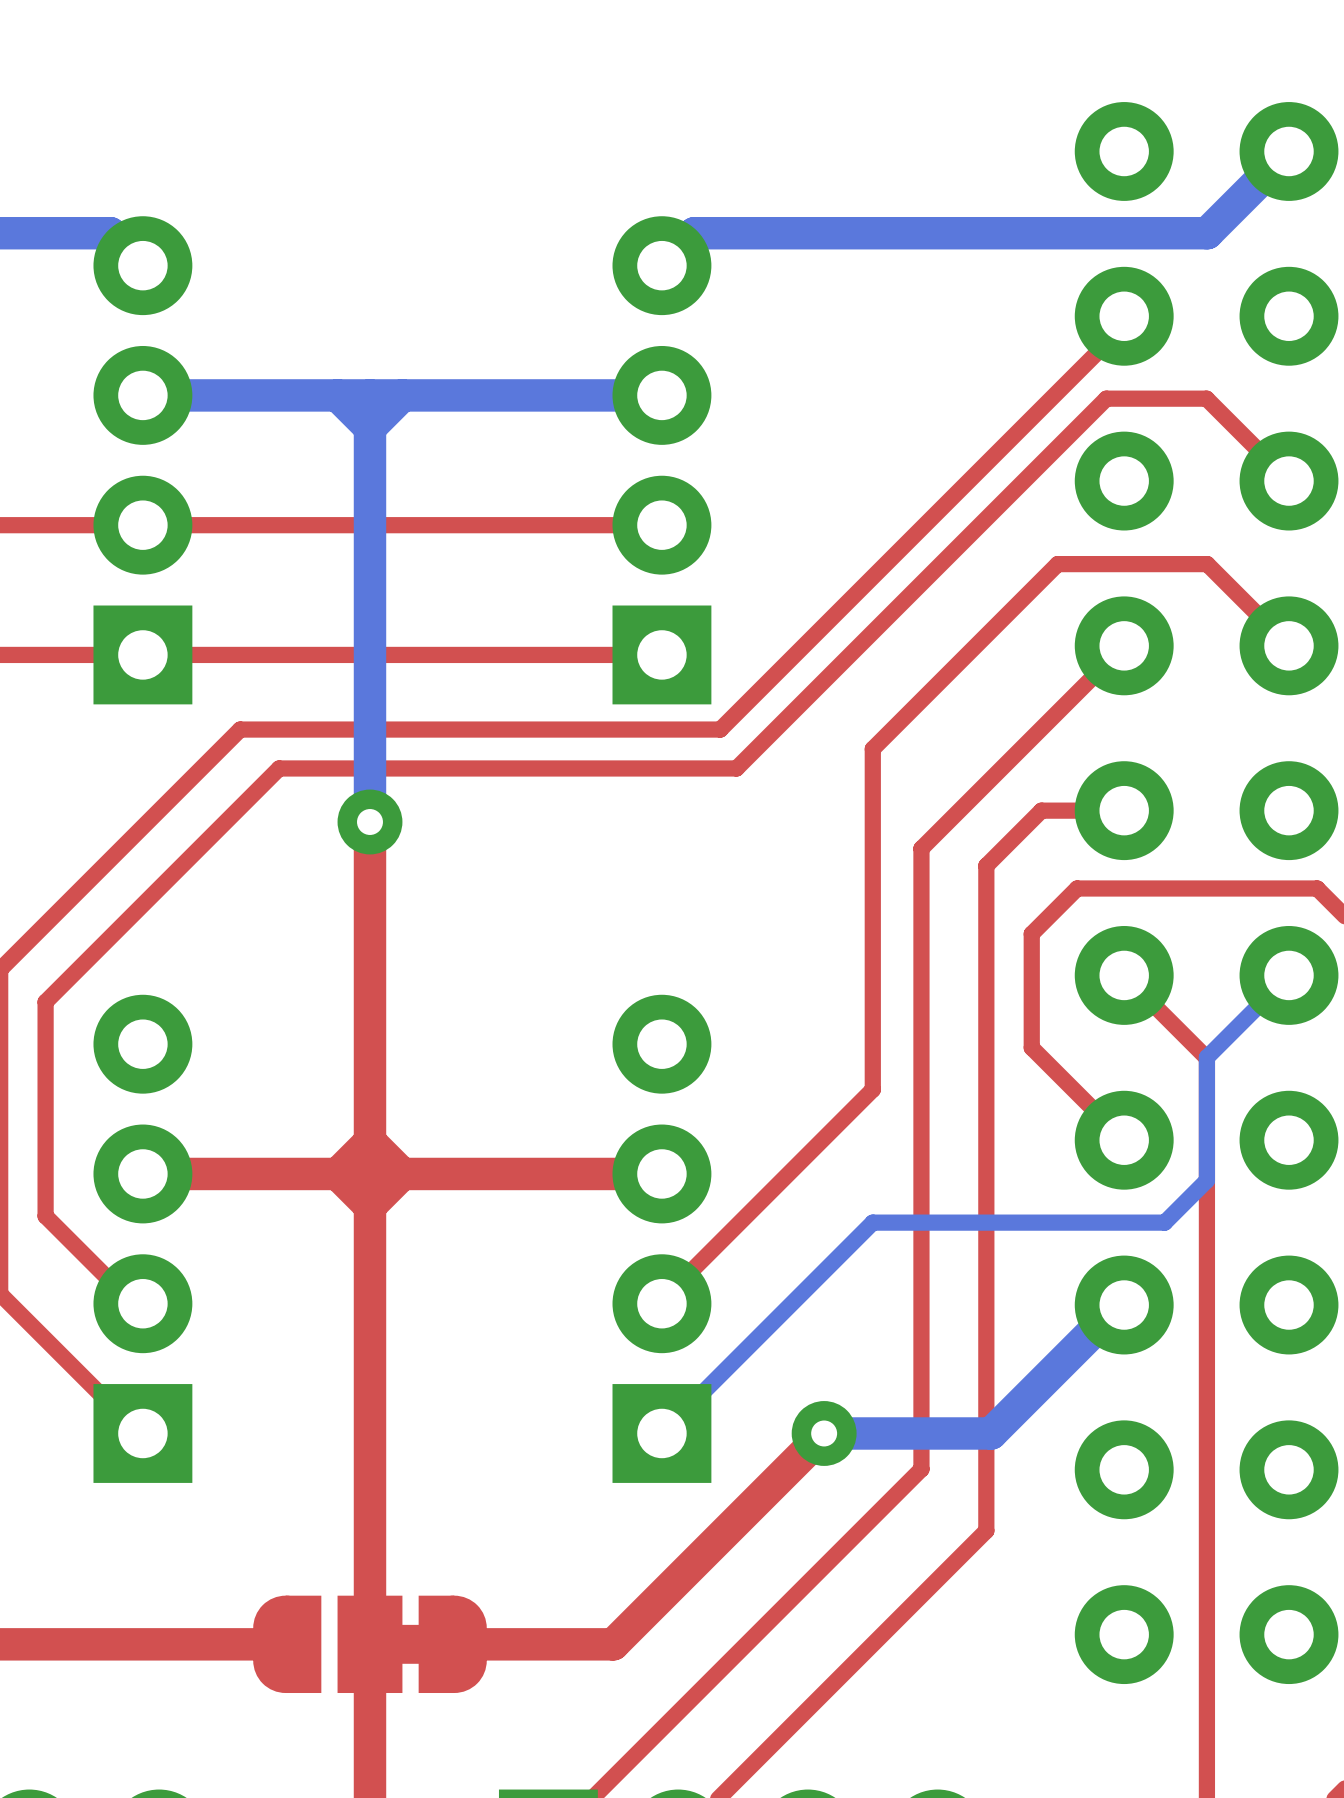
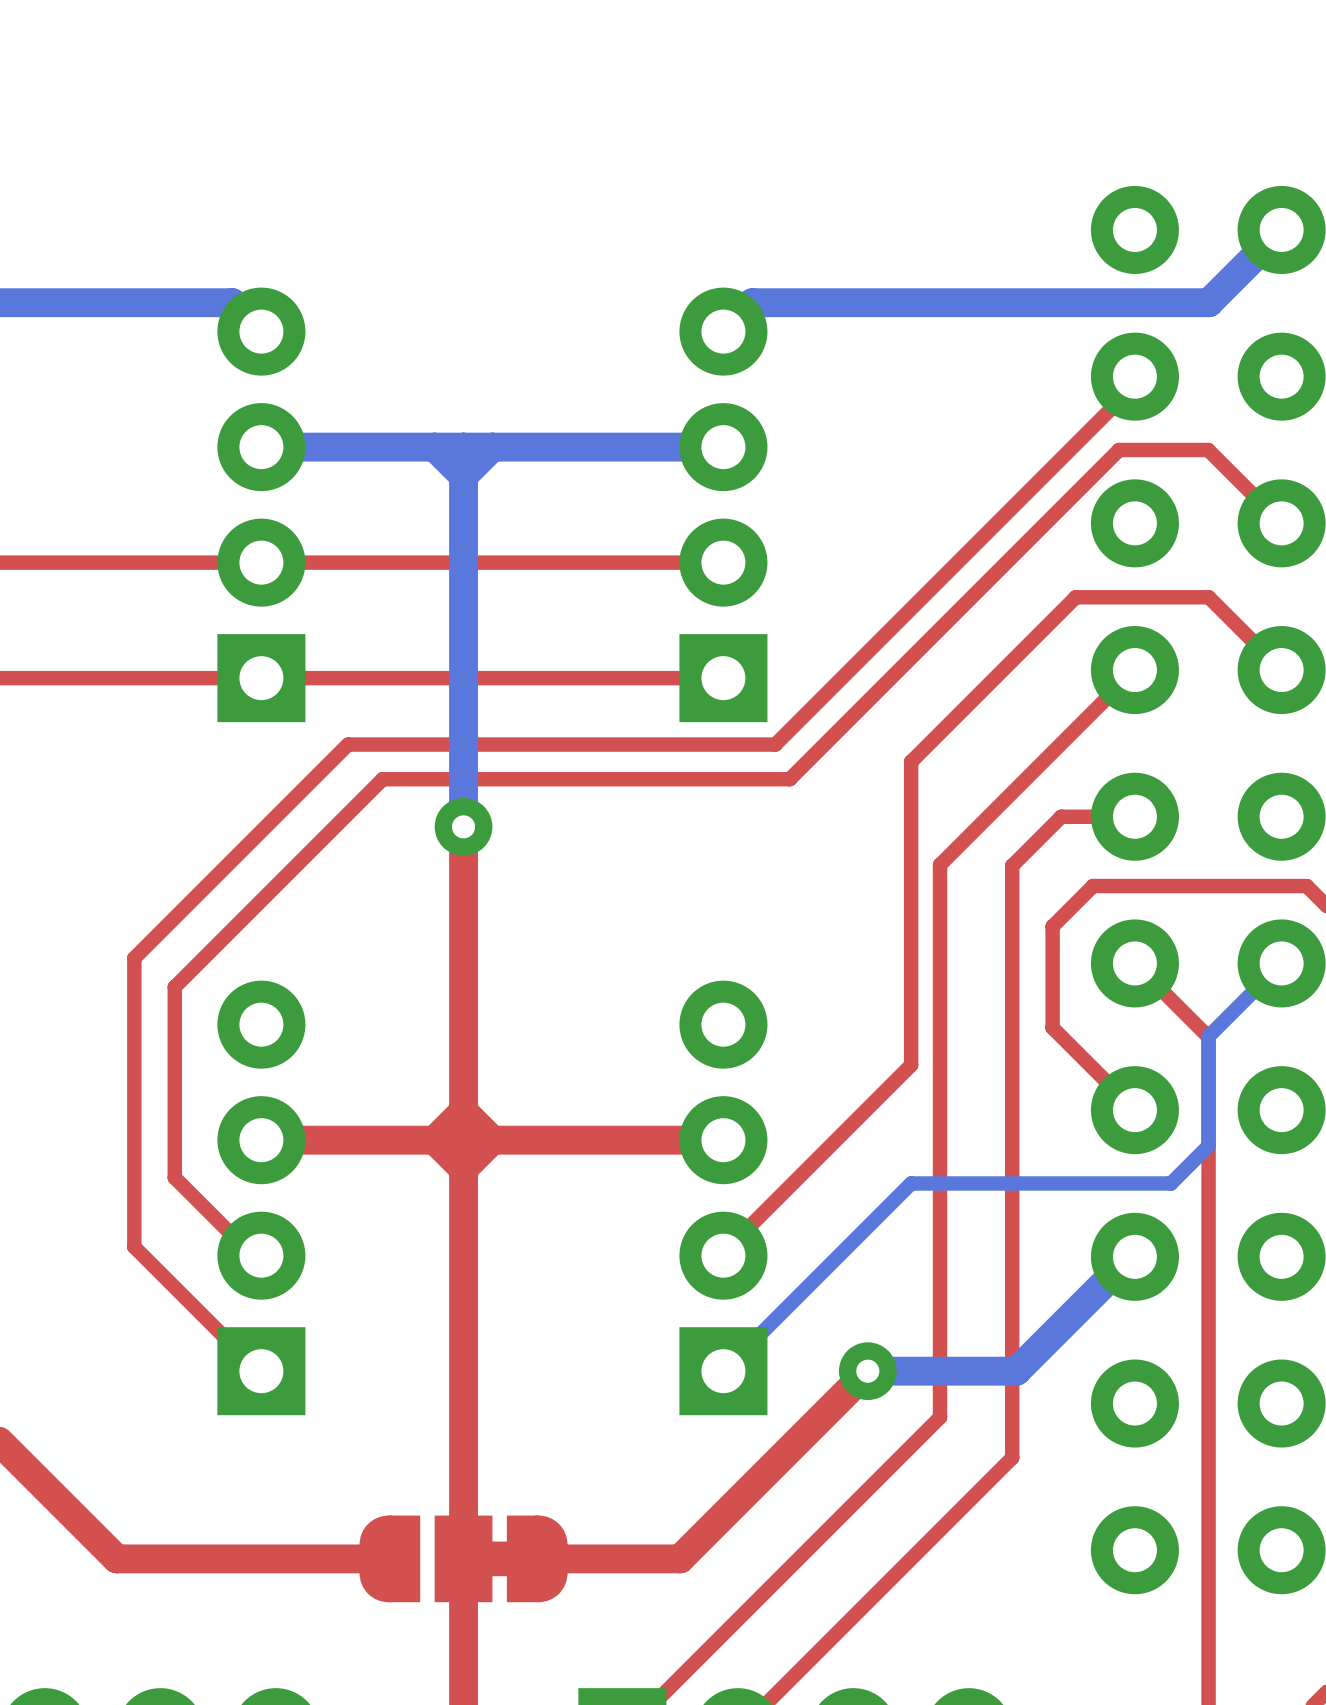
top track: (921, 848) (921, 1469) (905, 1485) -> (954, 850) (940, 864) (940, 1417)

